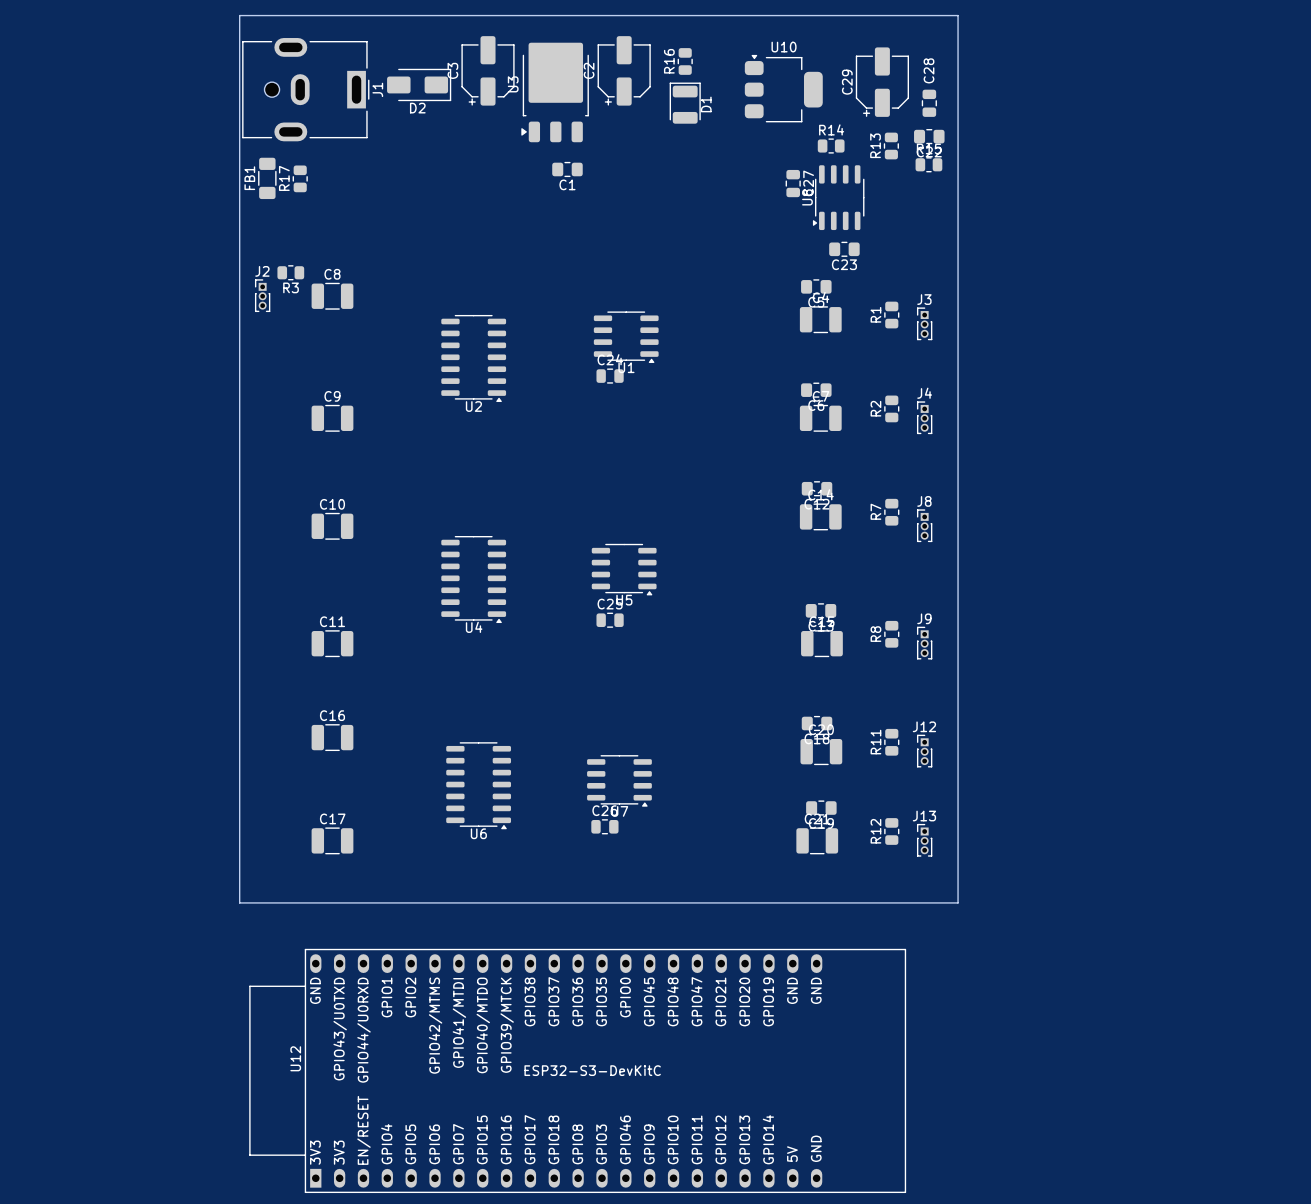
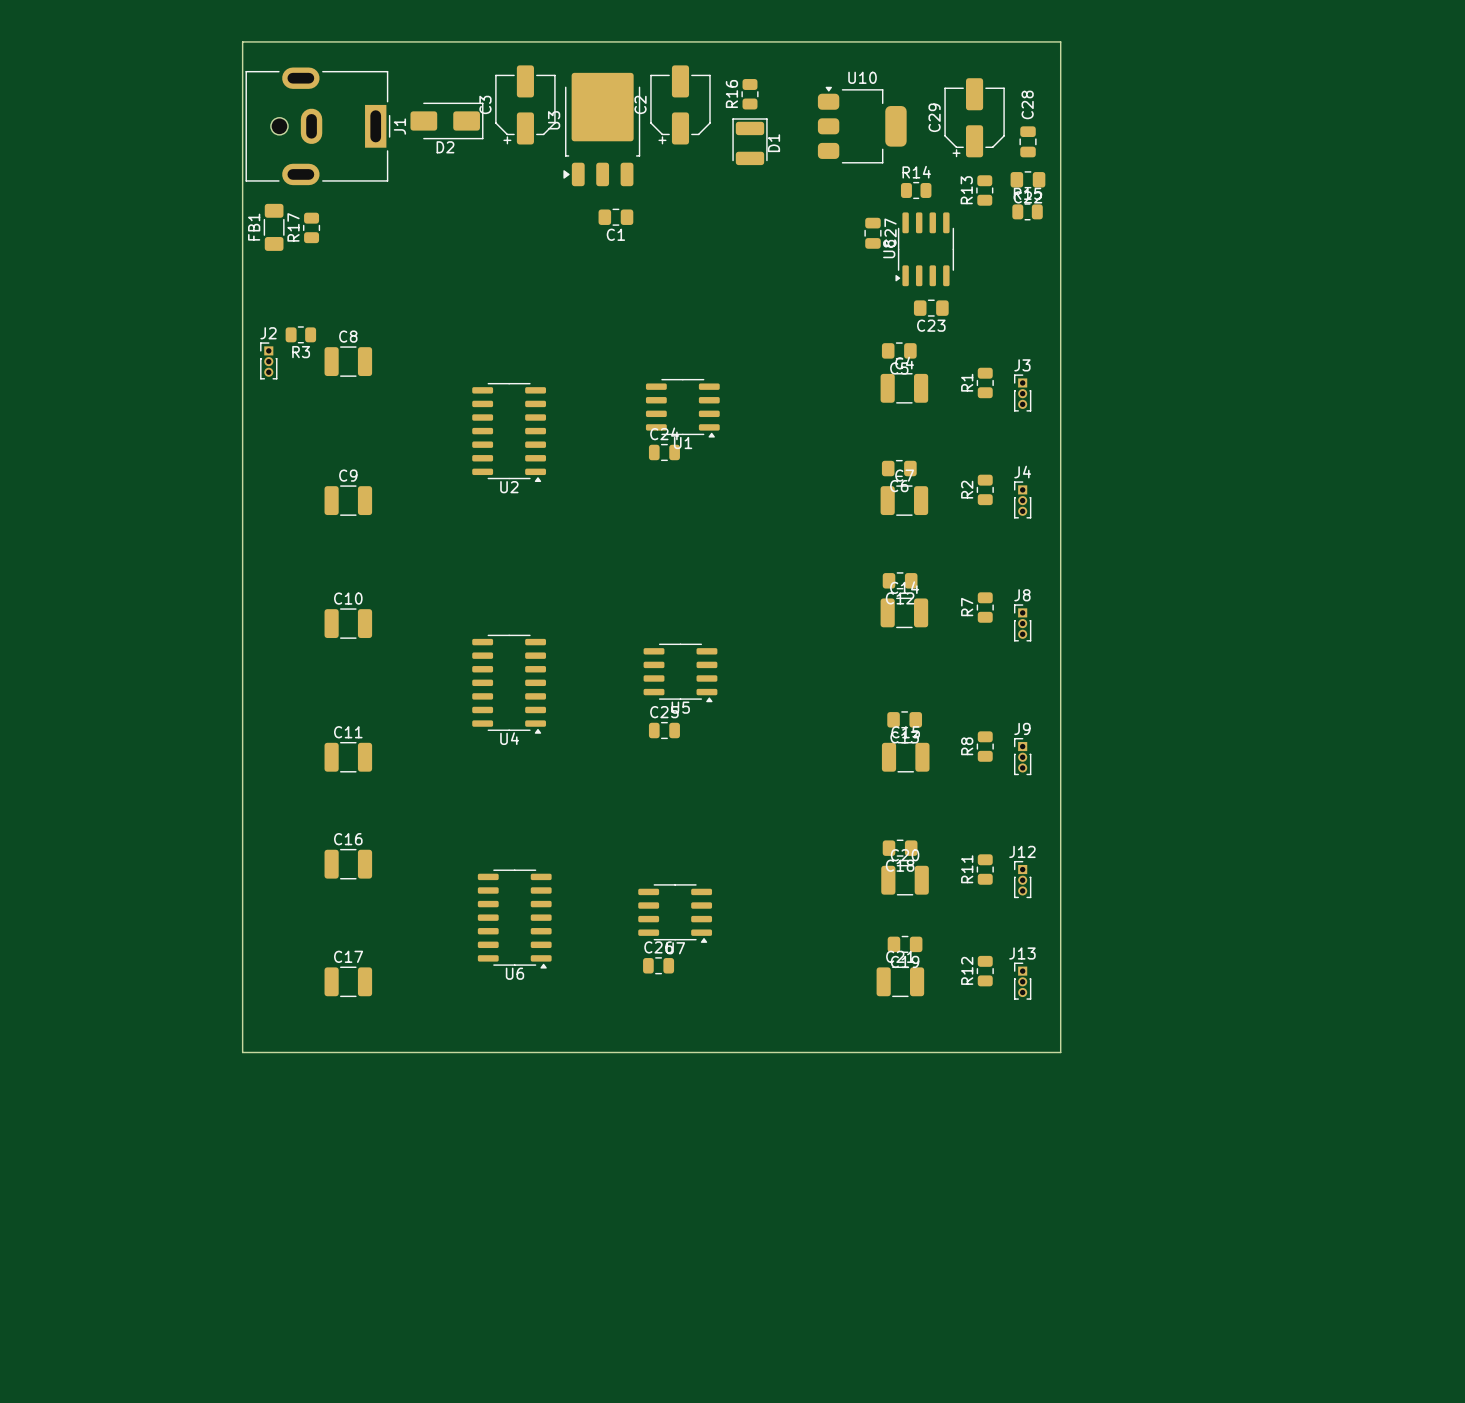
U12: ESP32-S3-DevKitC (577, 1070) -> none

